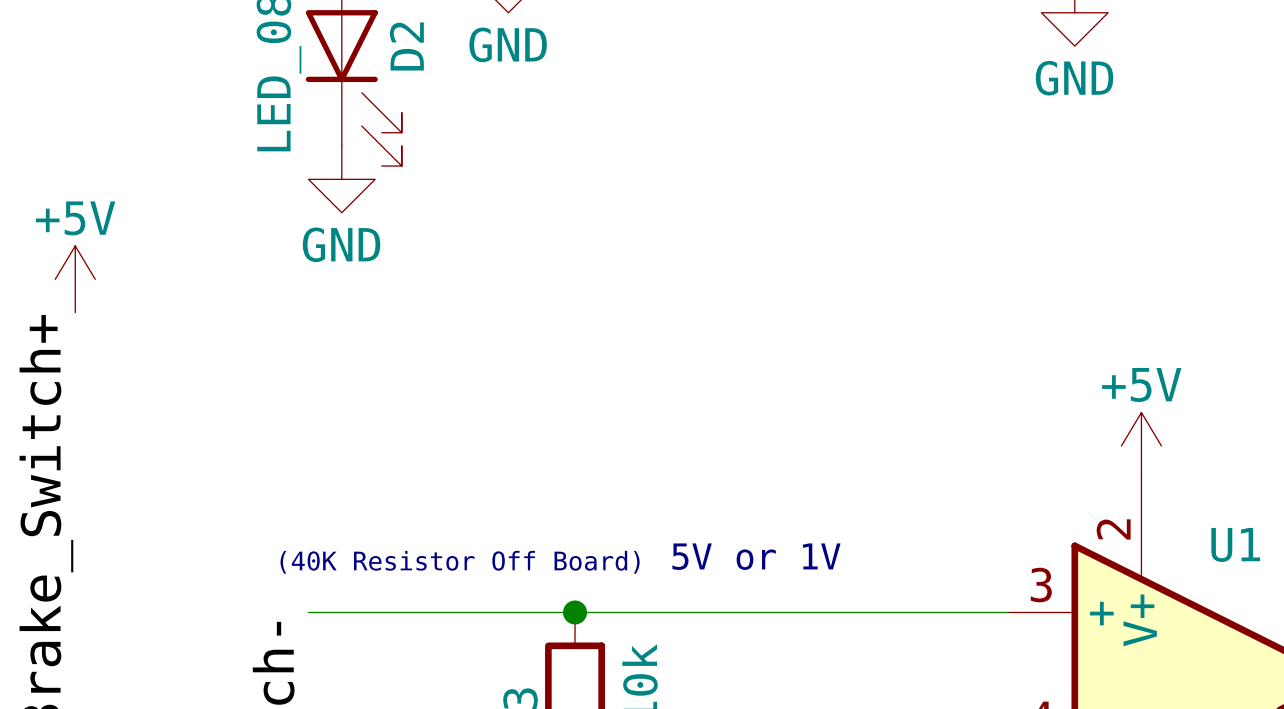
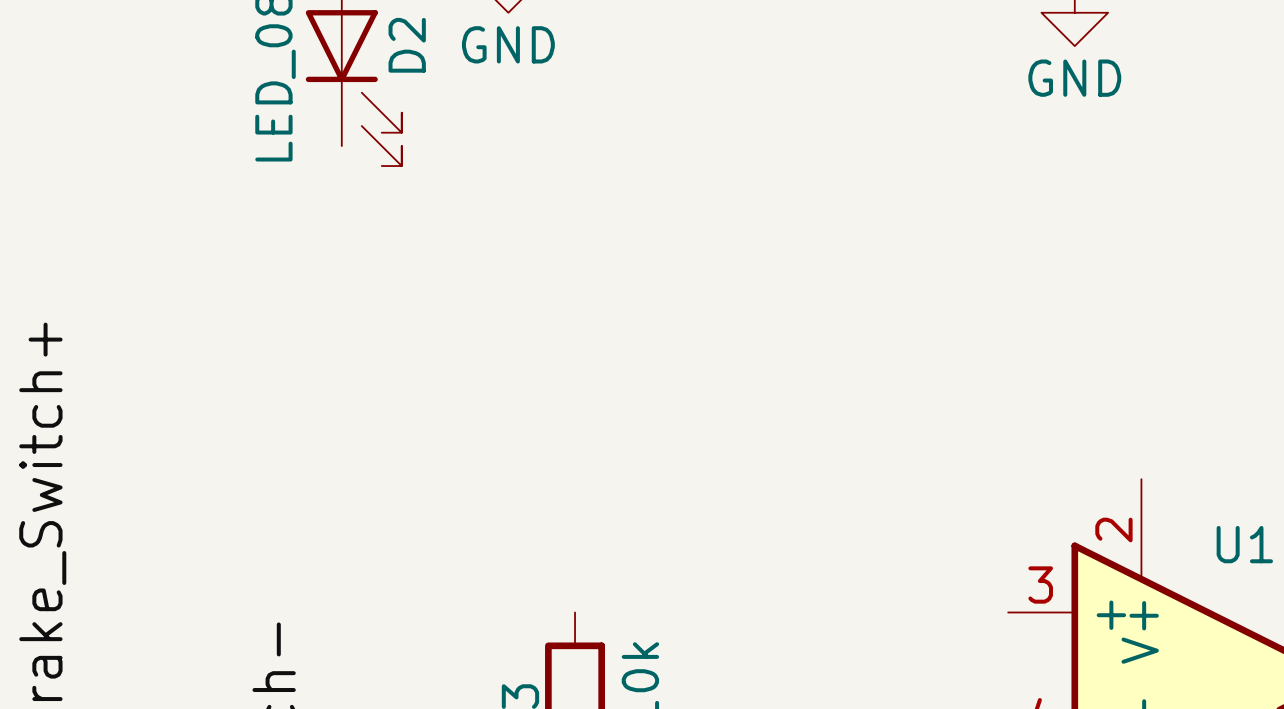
power symbol: GND (341, 179) -> none
power symbol: +5V (75, 279) -> none
power symbol: +5V (1141, 445) -> none
text: 5V or 1V (756, 556) -> none
text: (40K Resistor Off Board) (460, 562) -> none
wire: (308, 612) (1008, 612) -> none
junction: (575, 612) -> none

